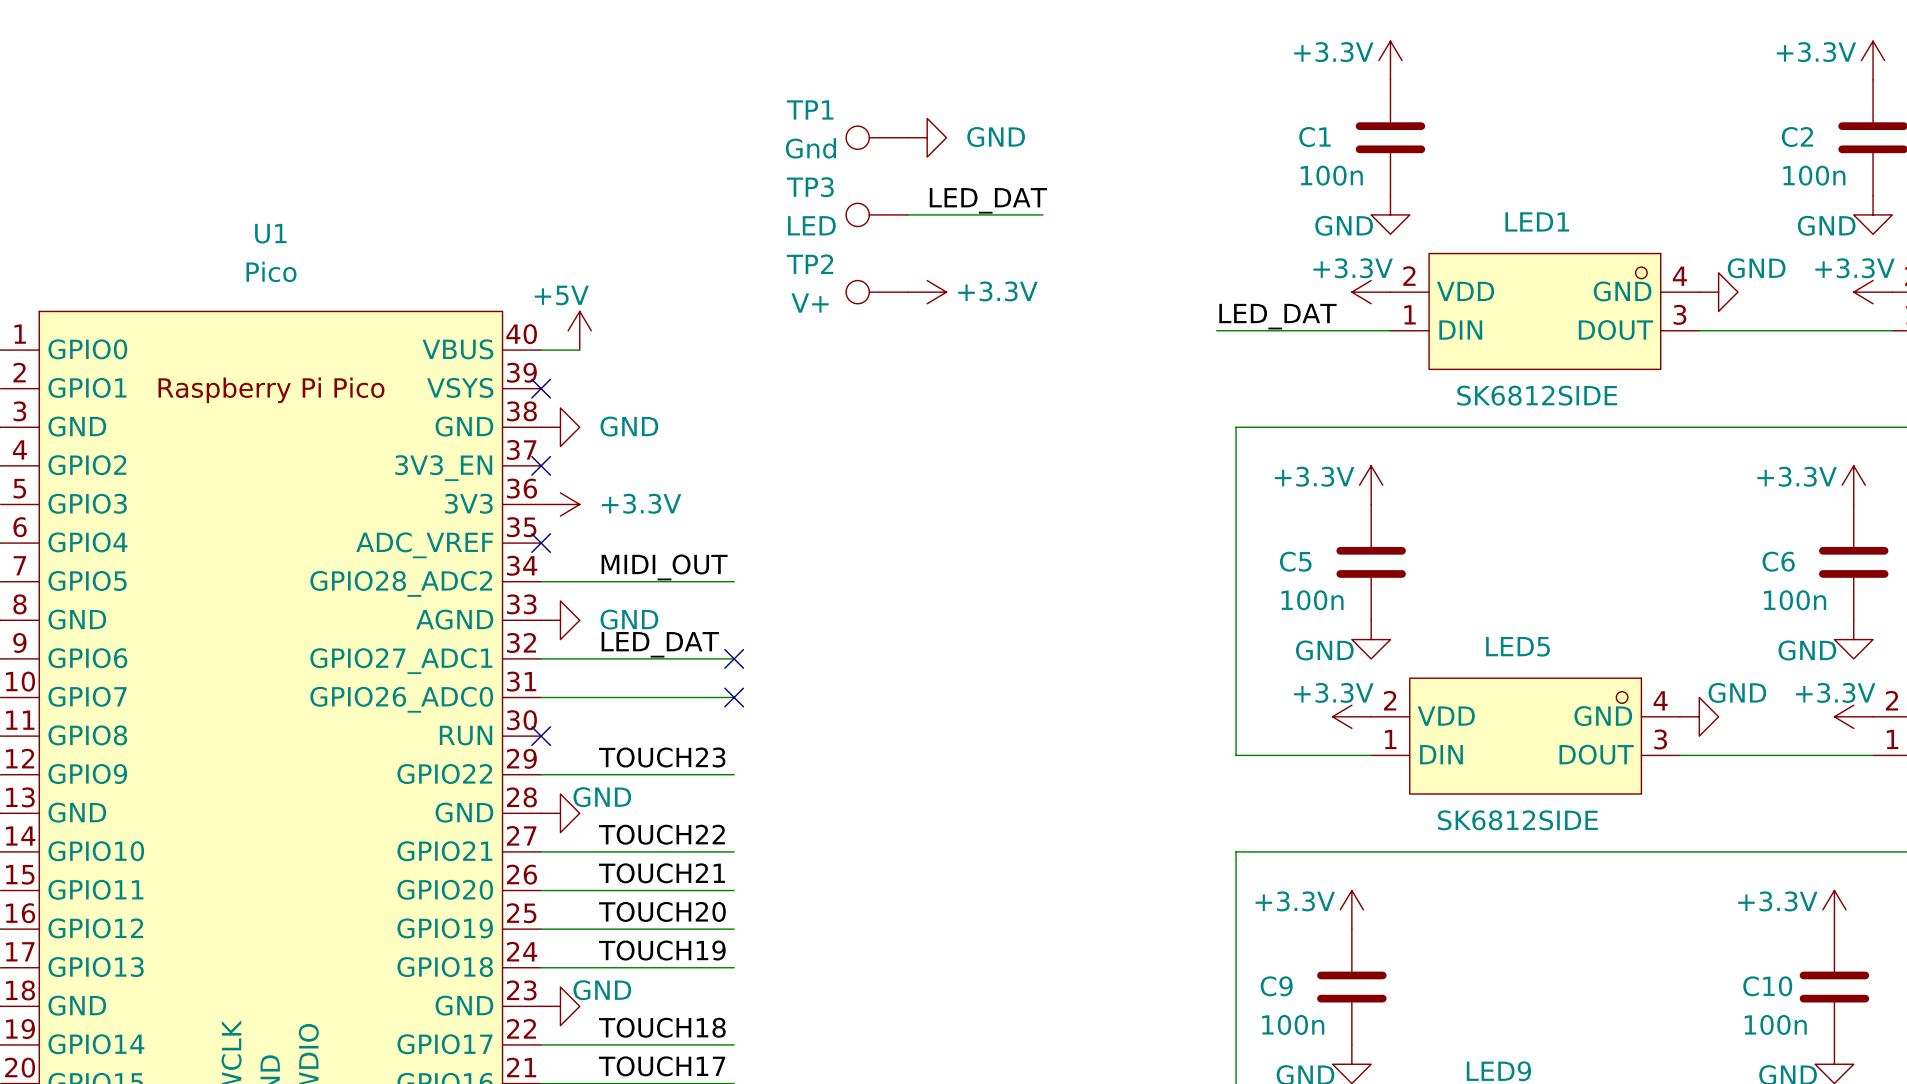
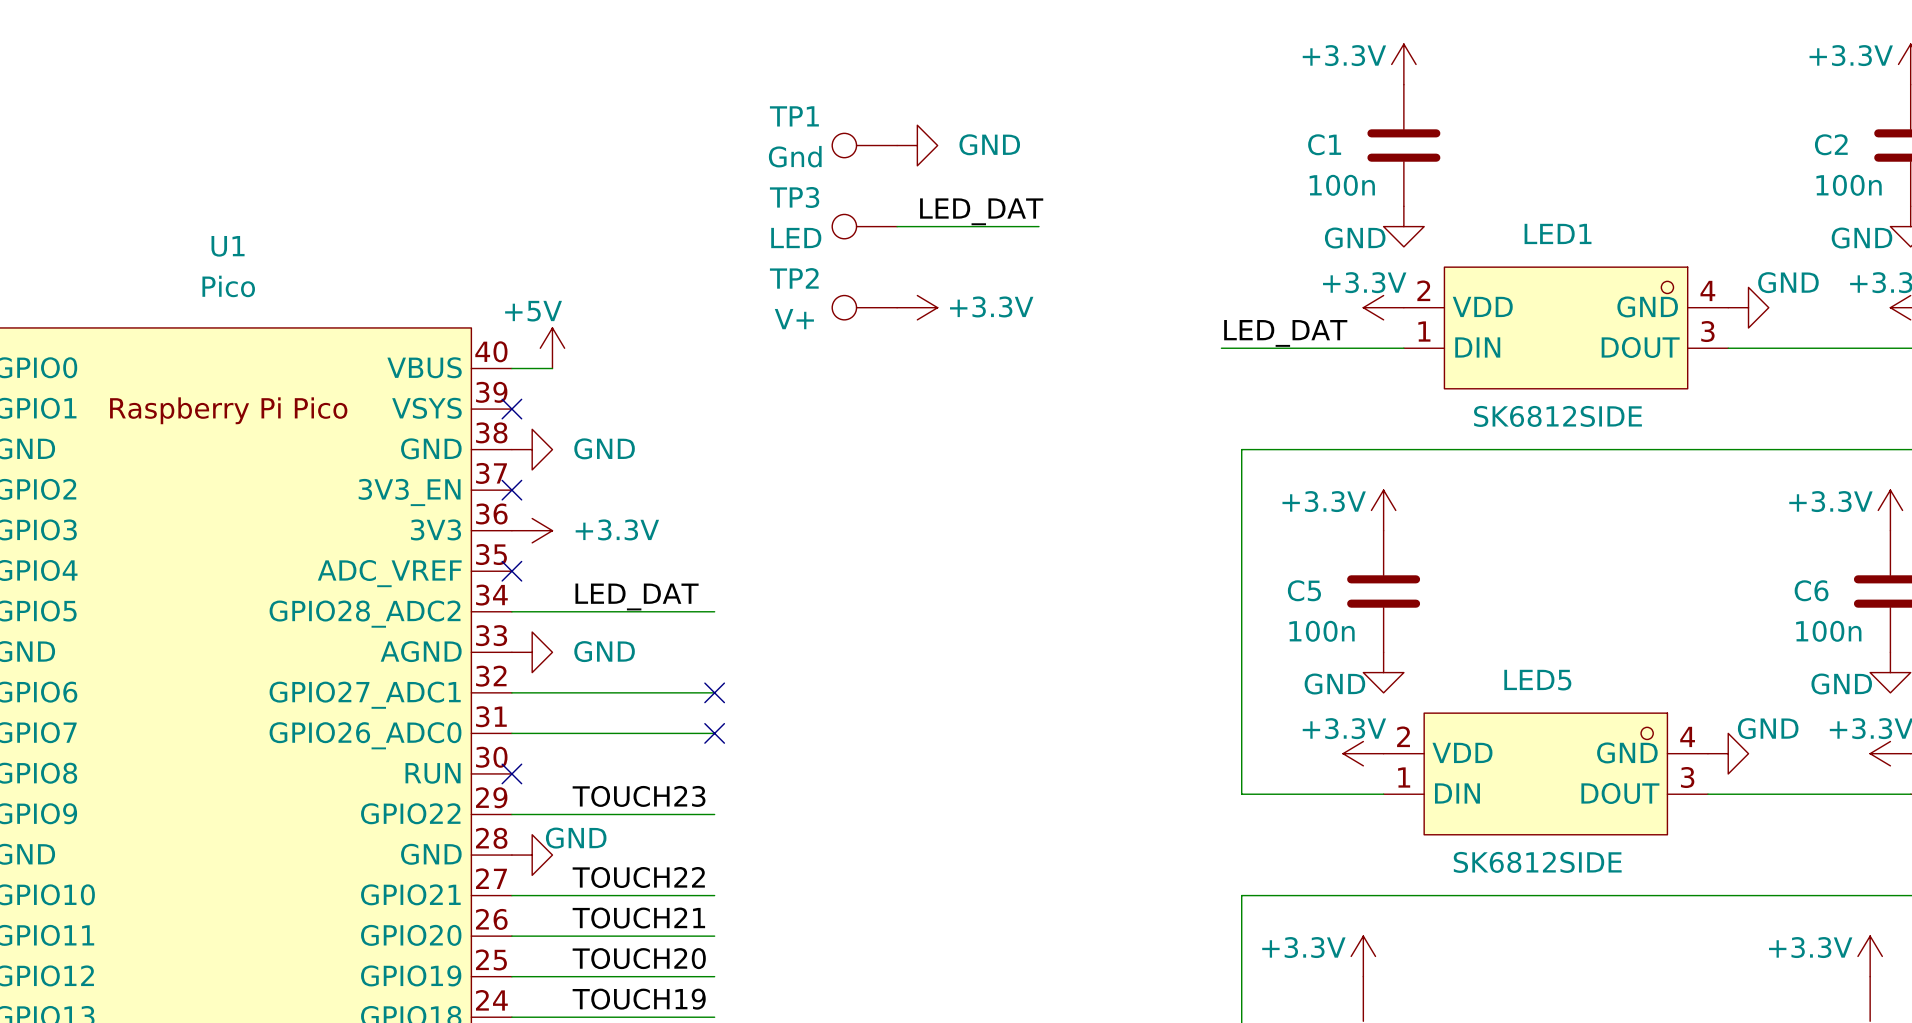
label: MIDI_OUT (664, 567) -> LED_DAT (637, 596)
label: LED_DAT (660, 644) -> none

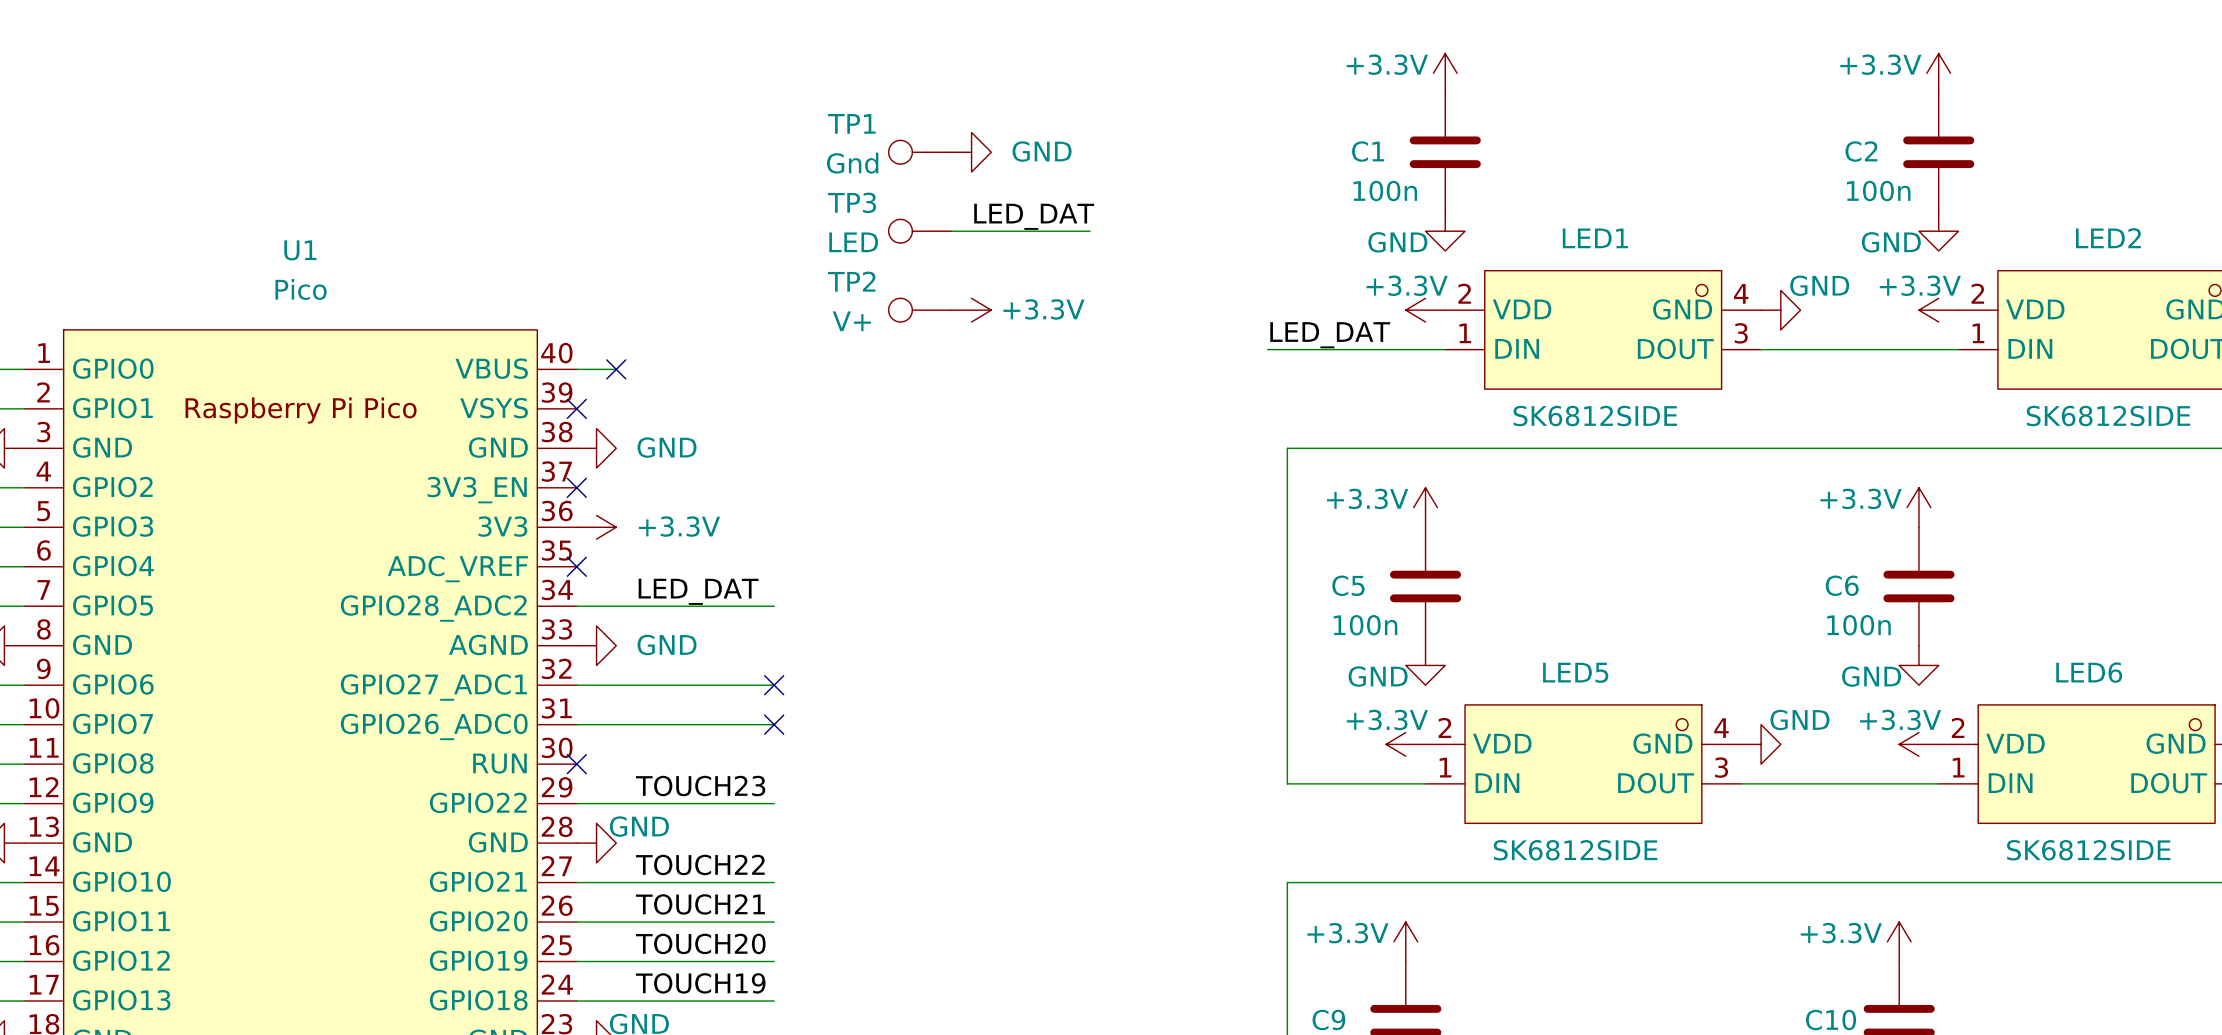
power symbol: +5V (552, 348) -> none
no-connect mark: none -> (616, 369)

